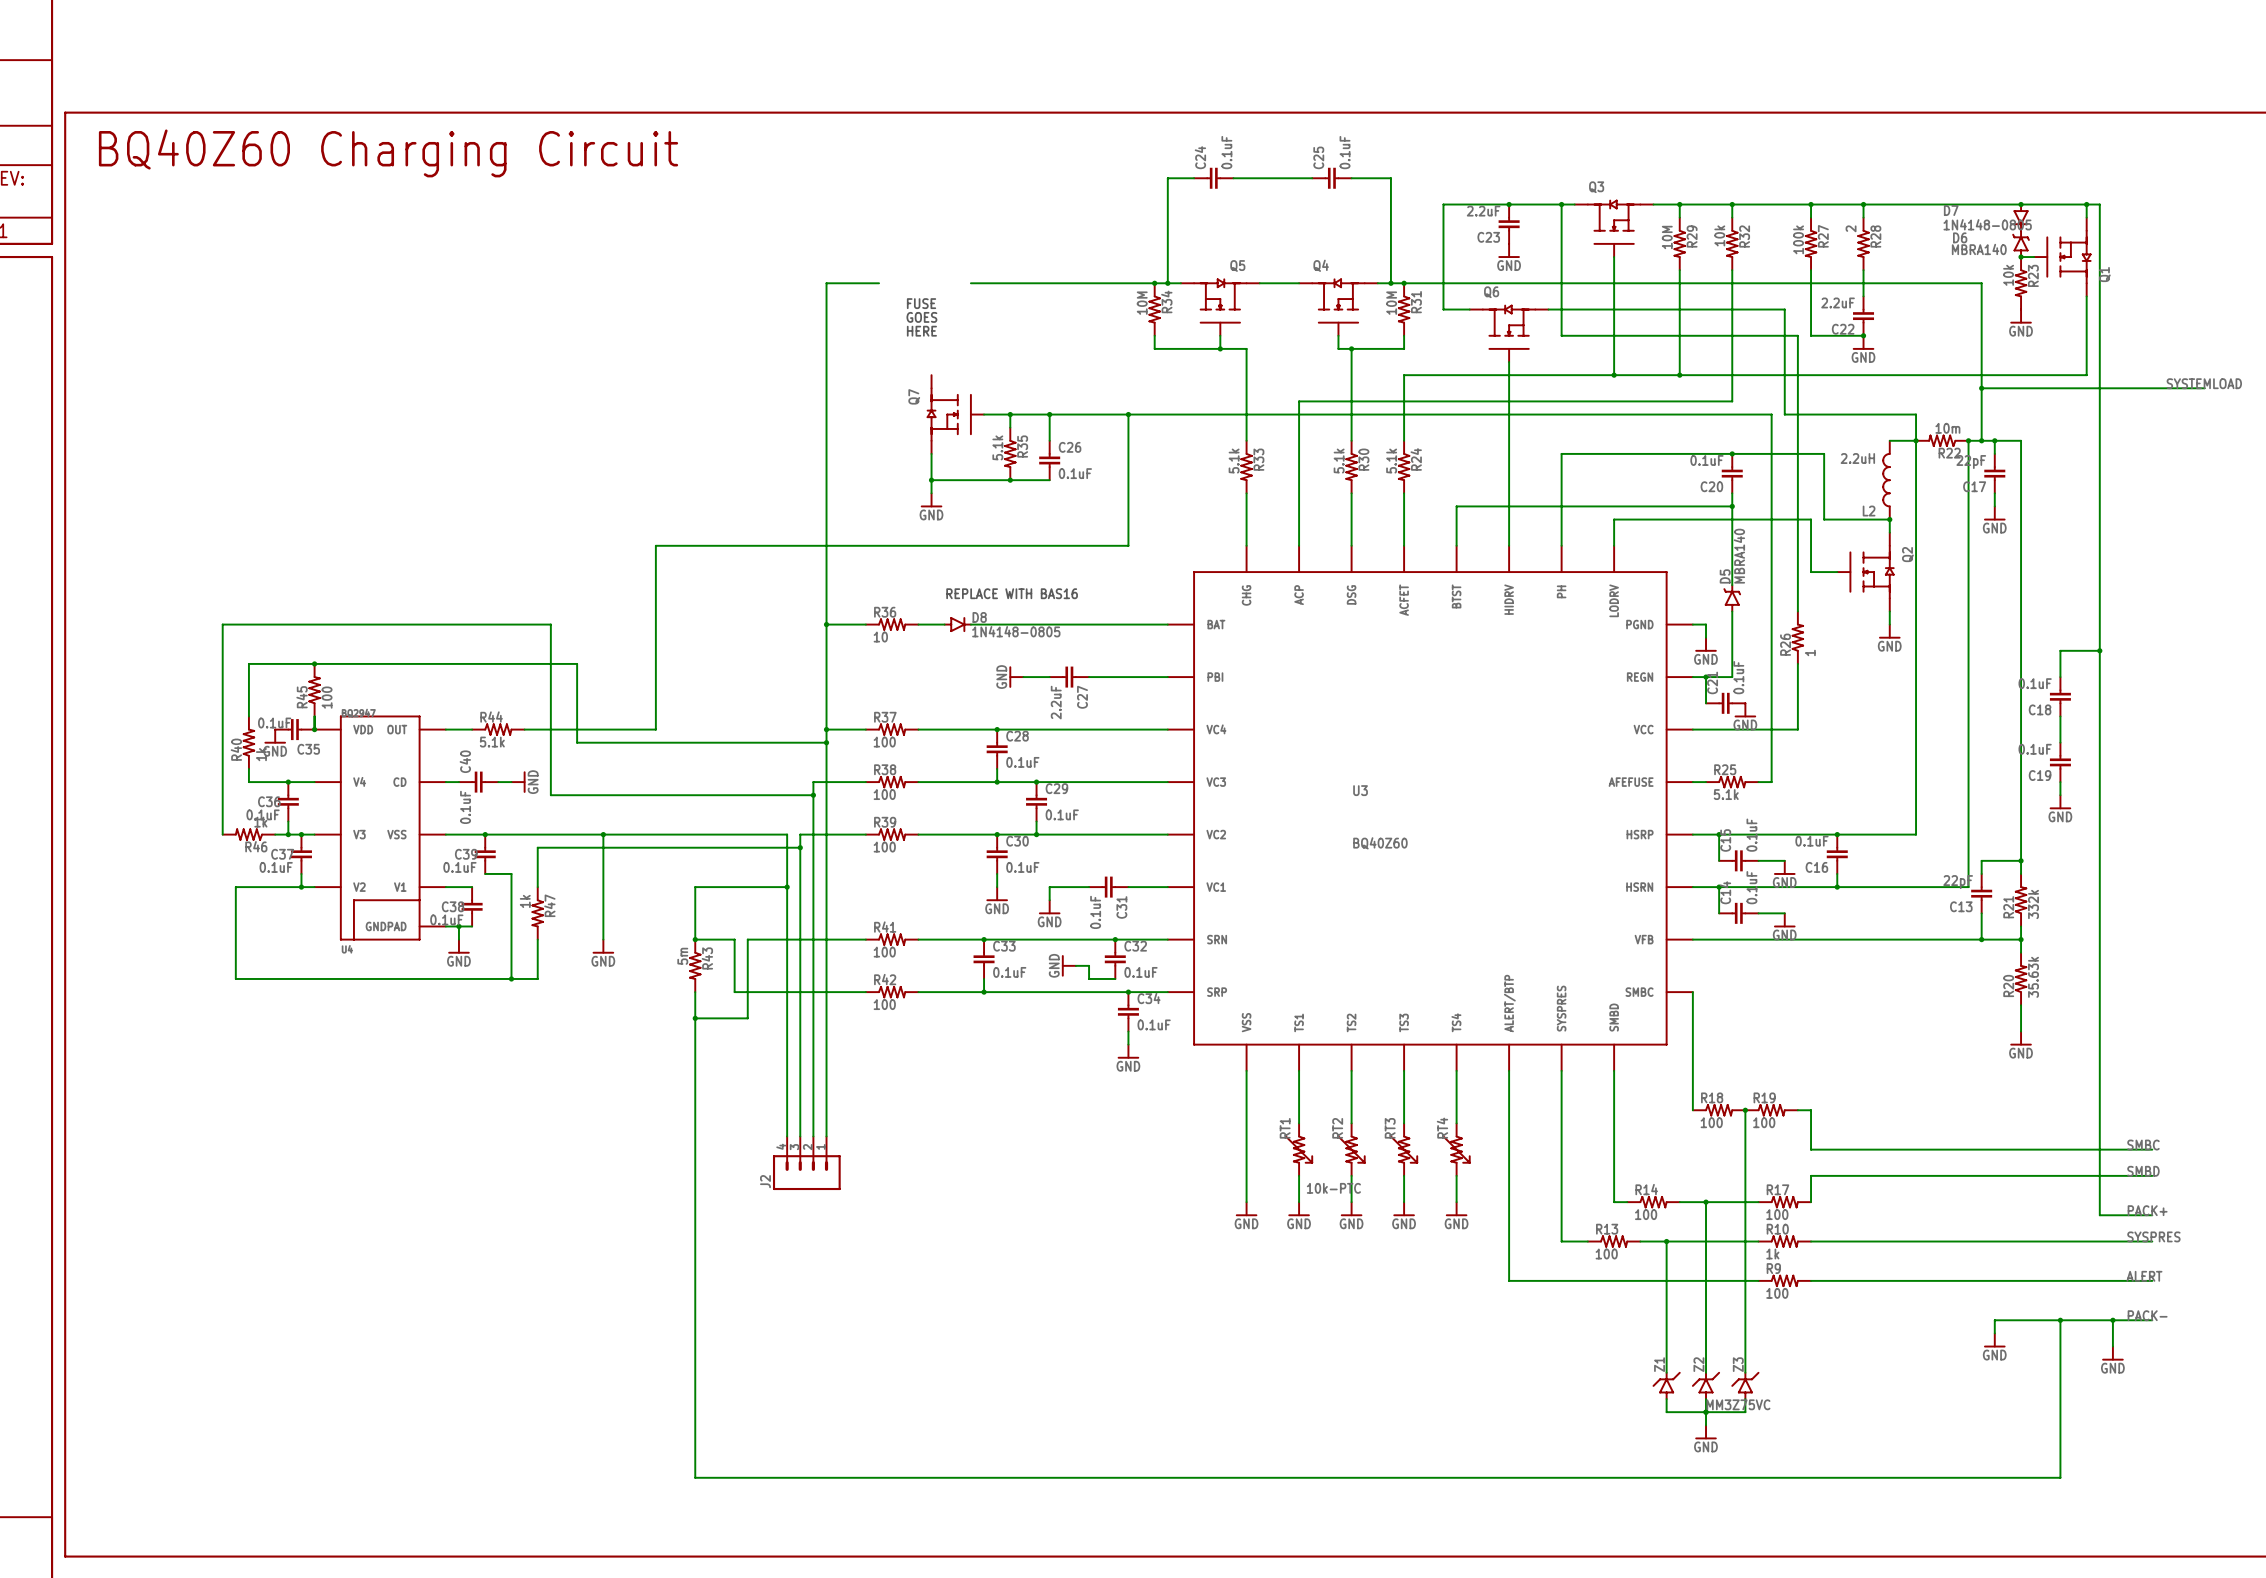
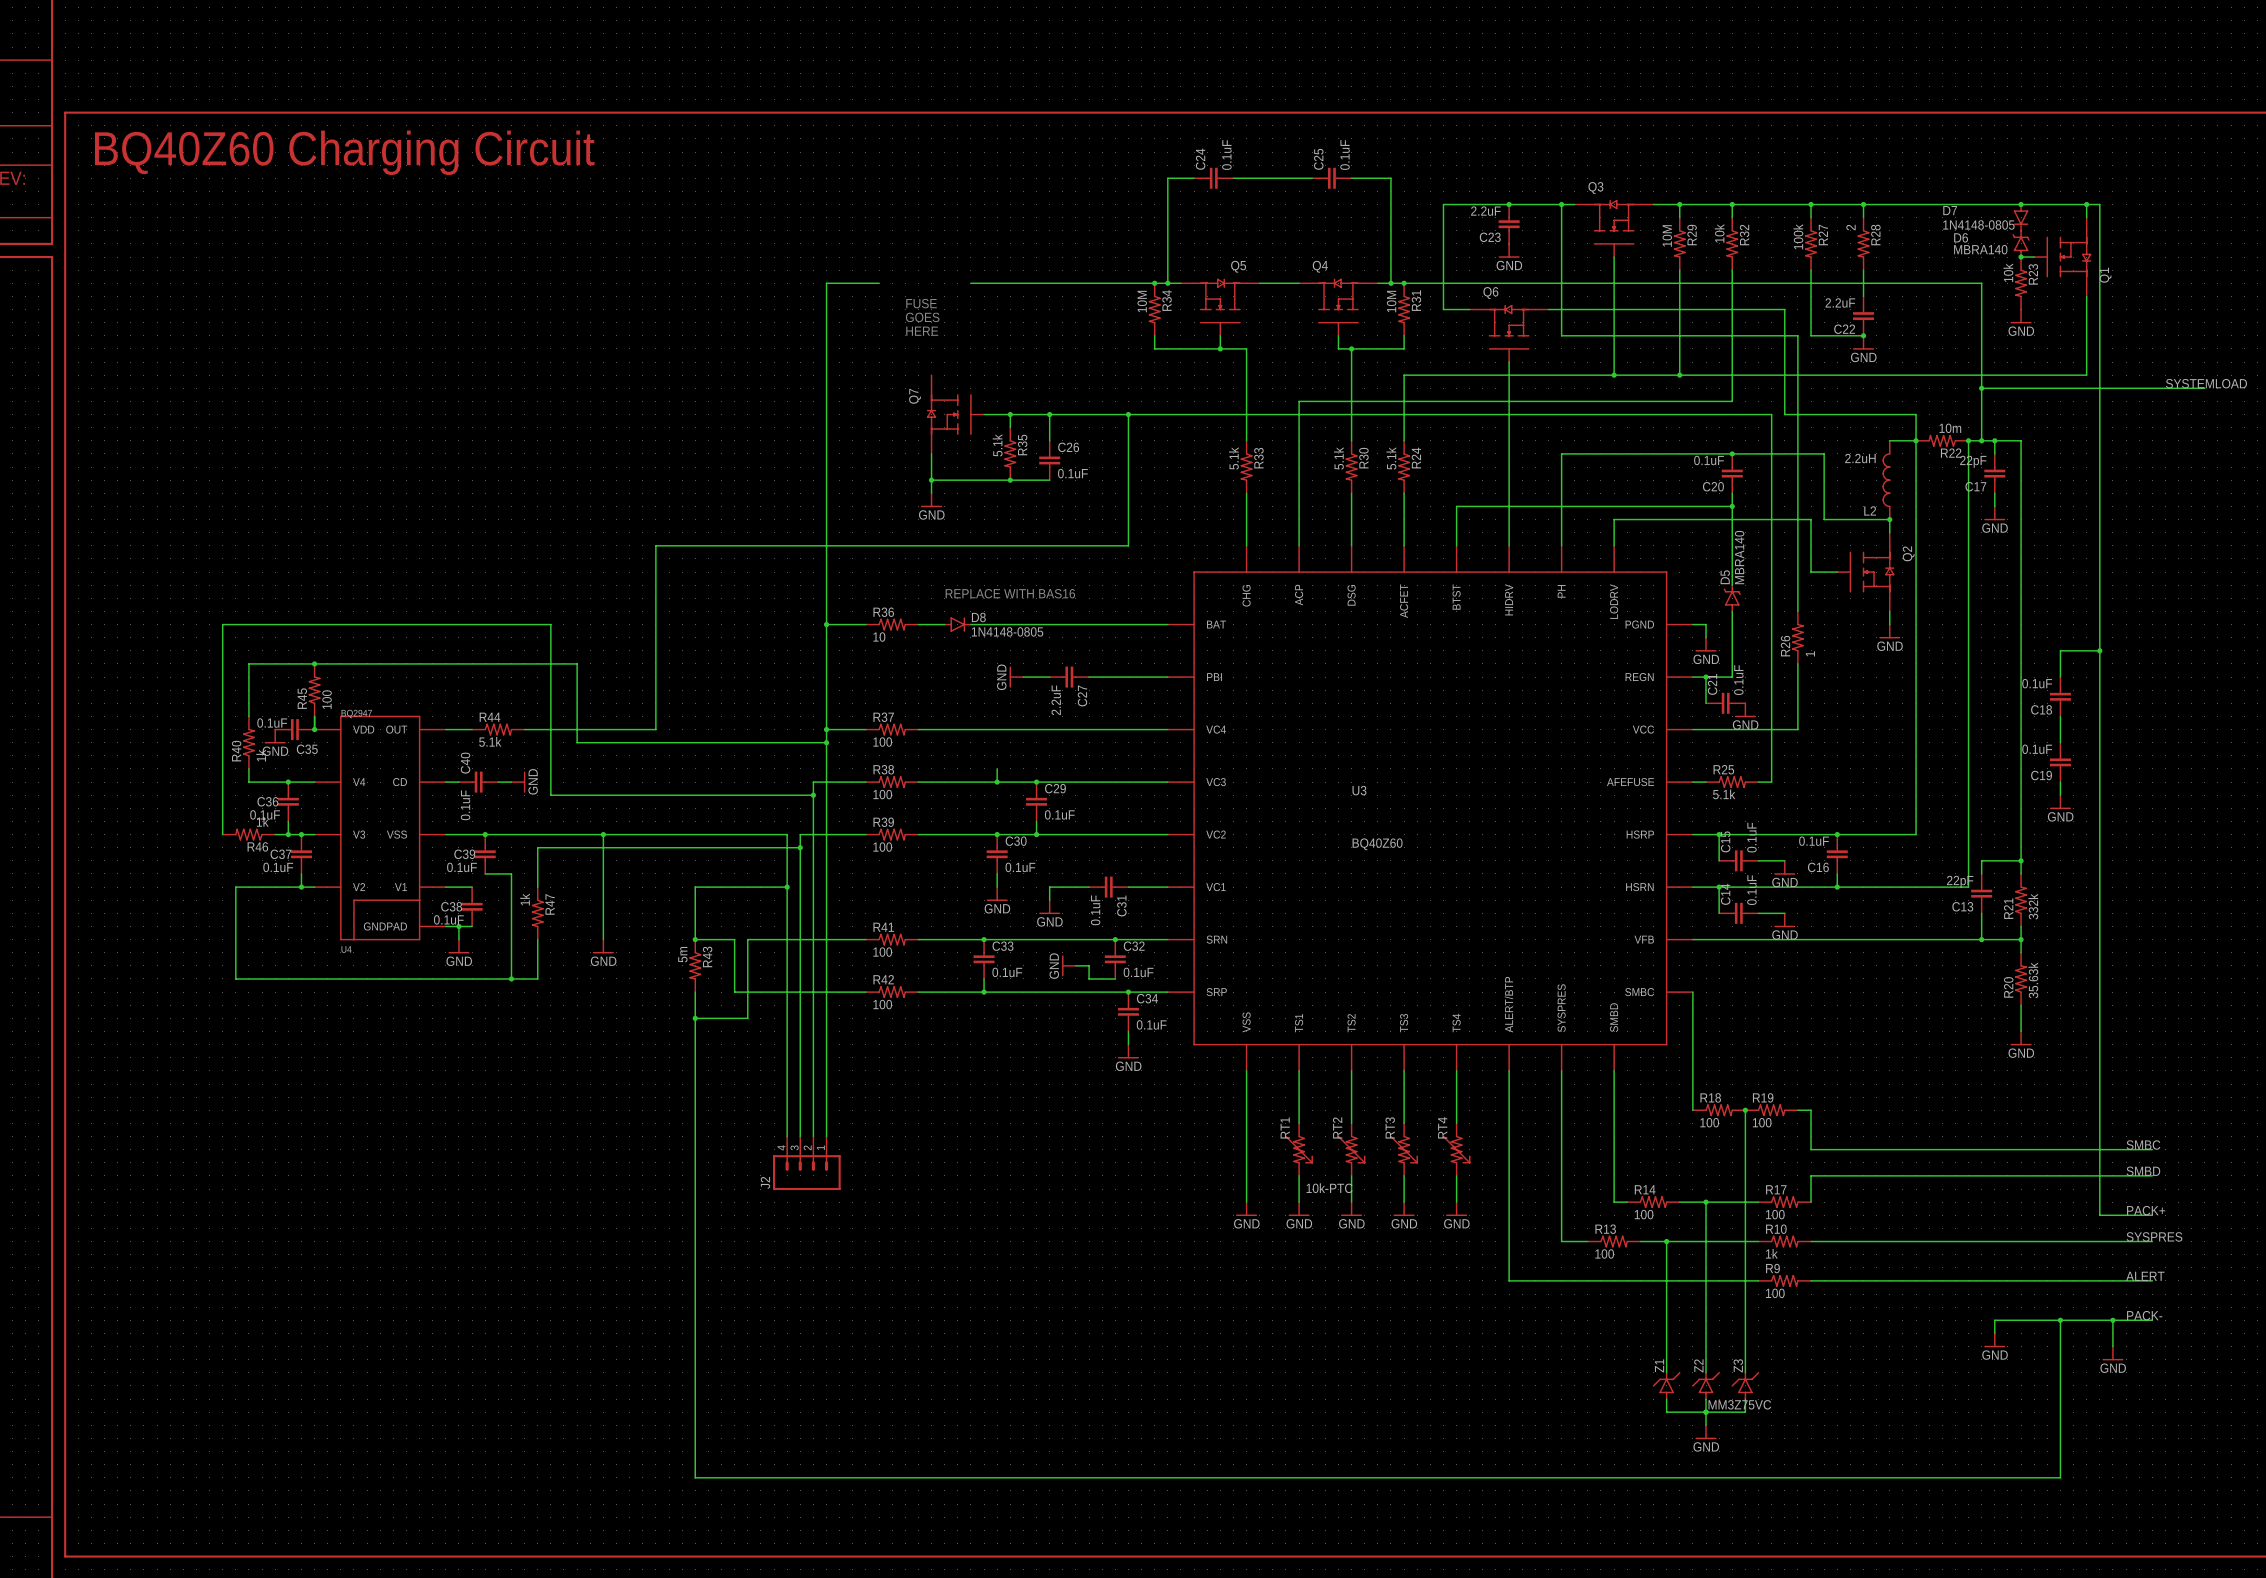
junction: (997, 729) -> none
C28: 0.1uF (997, 749) -> none

